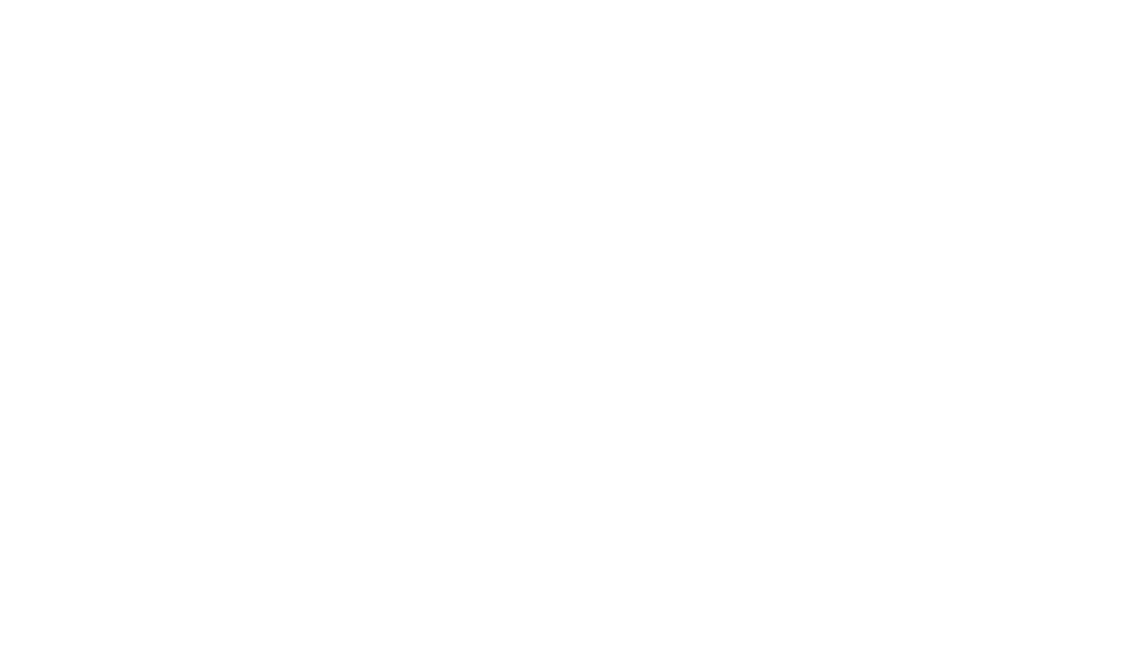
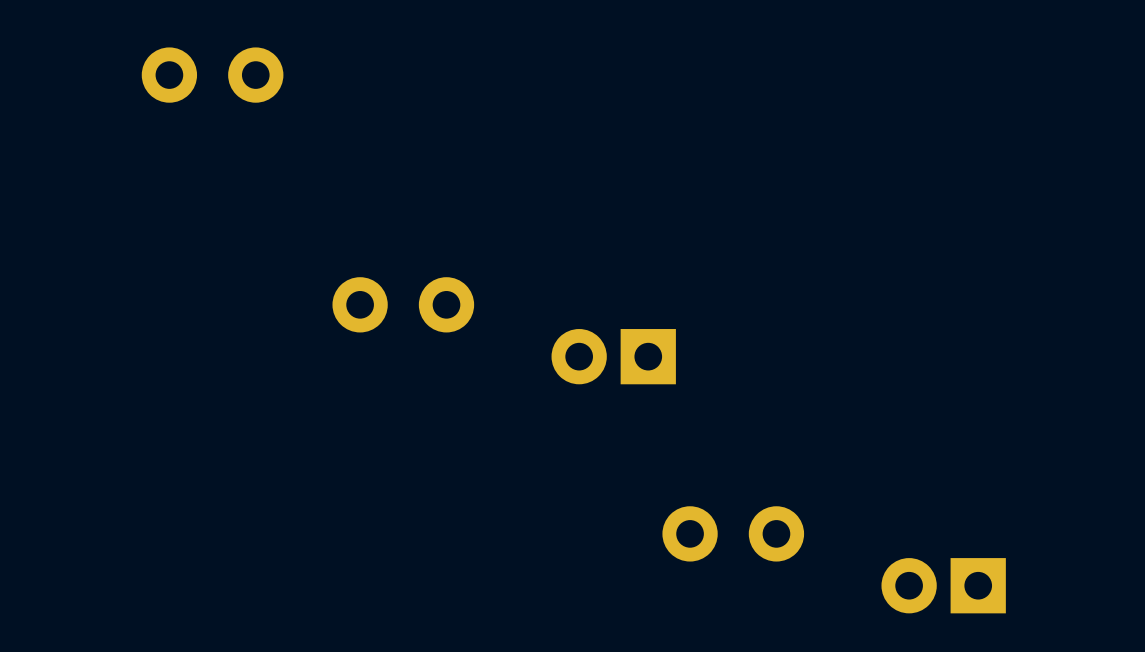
part: none -> (212, 75)
part: none -> (403, 304)
part: none -> (613, 356)
part: none -> (733, 533)
part: none -> (943, 585)

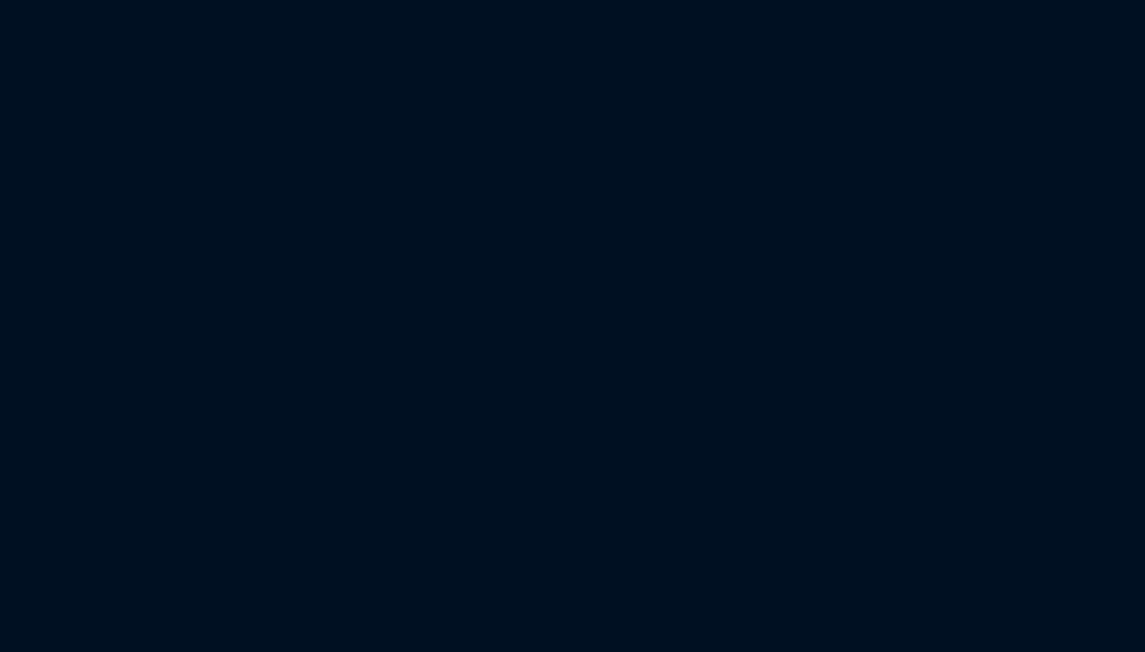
part: (212, 75) -> none
part: (403, 304) -> none
part: (613, 356) -> none
part: (733, 533) -> none
part: (943, 585) -> none

